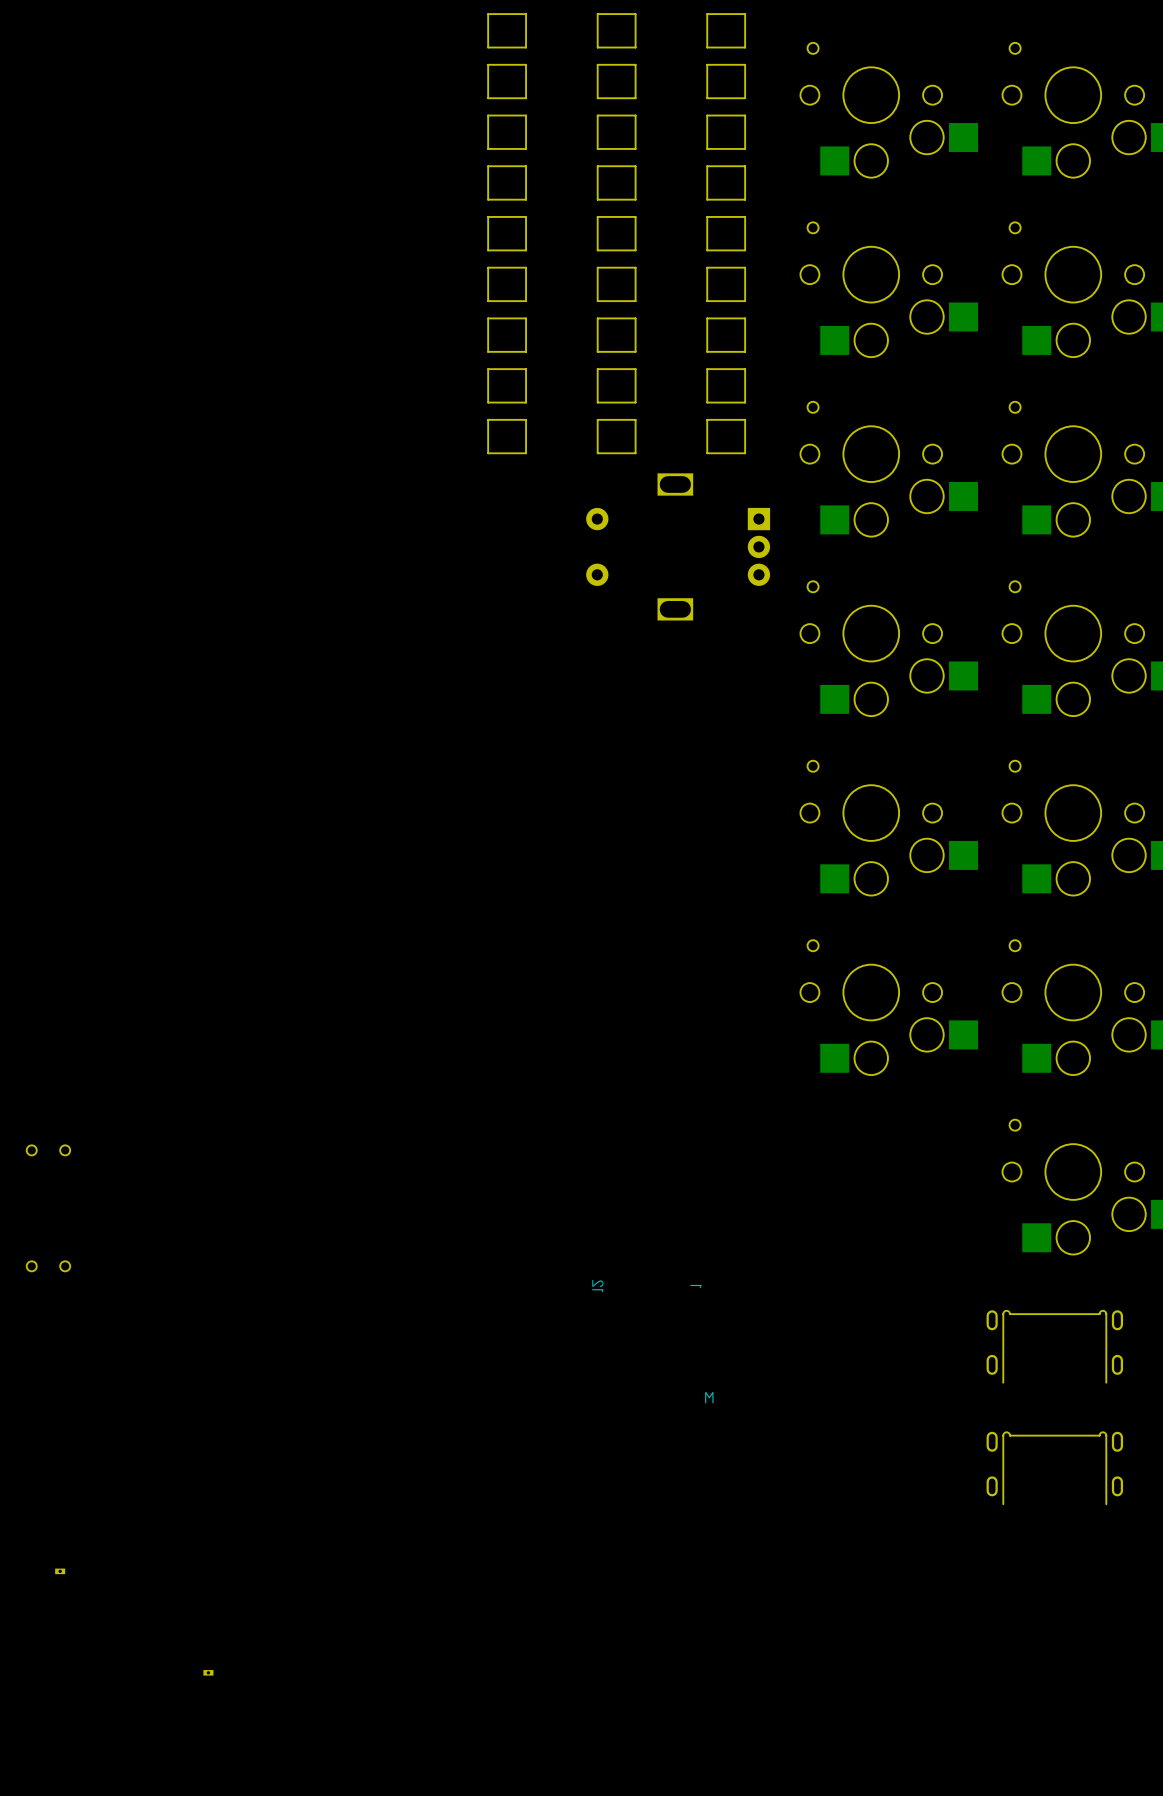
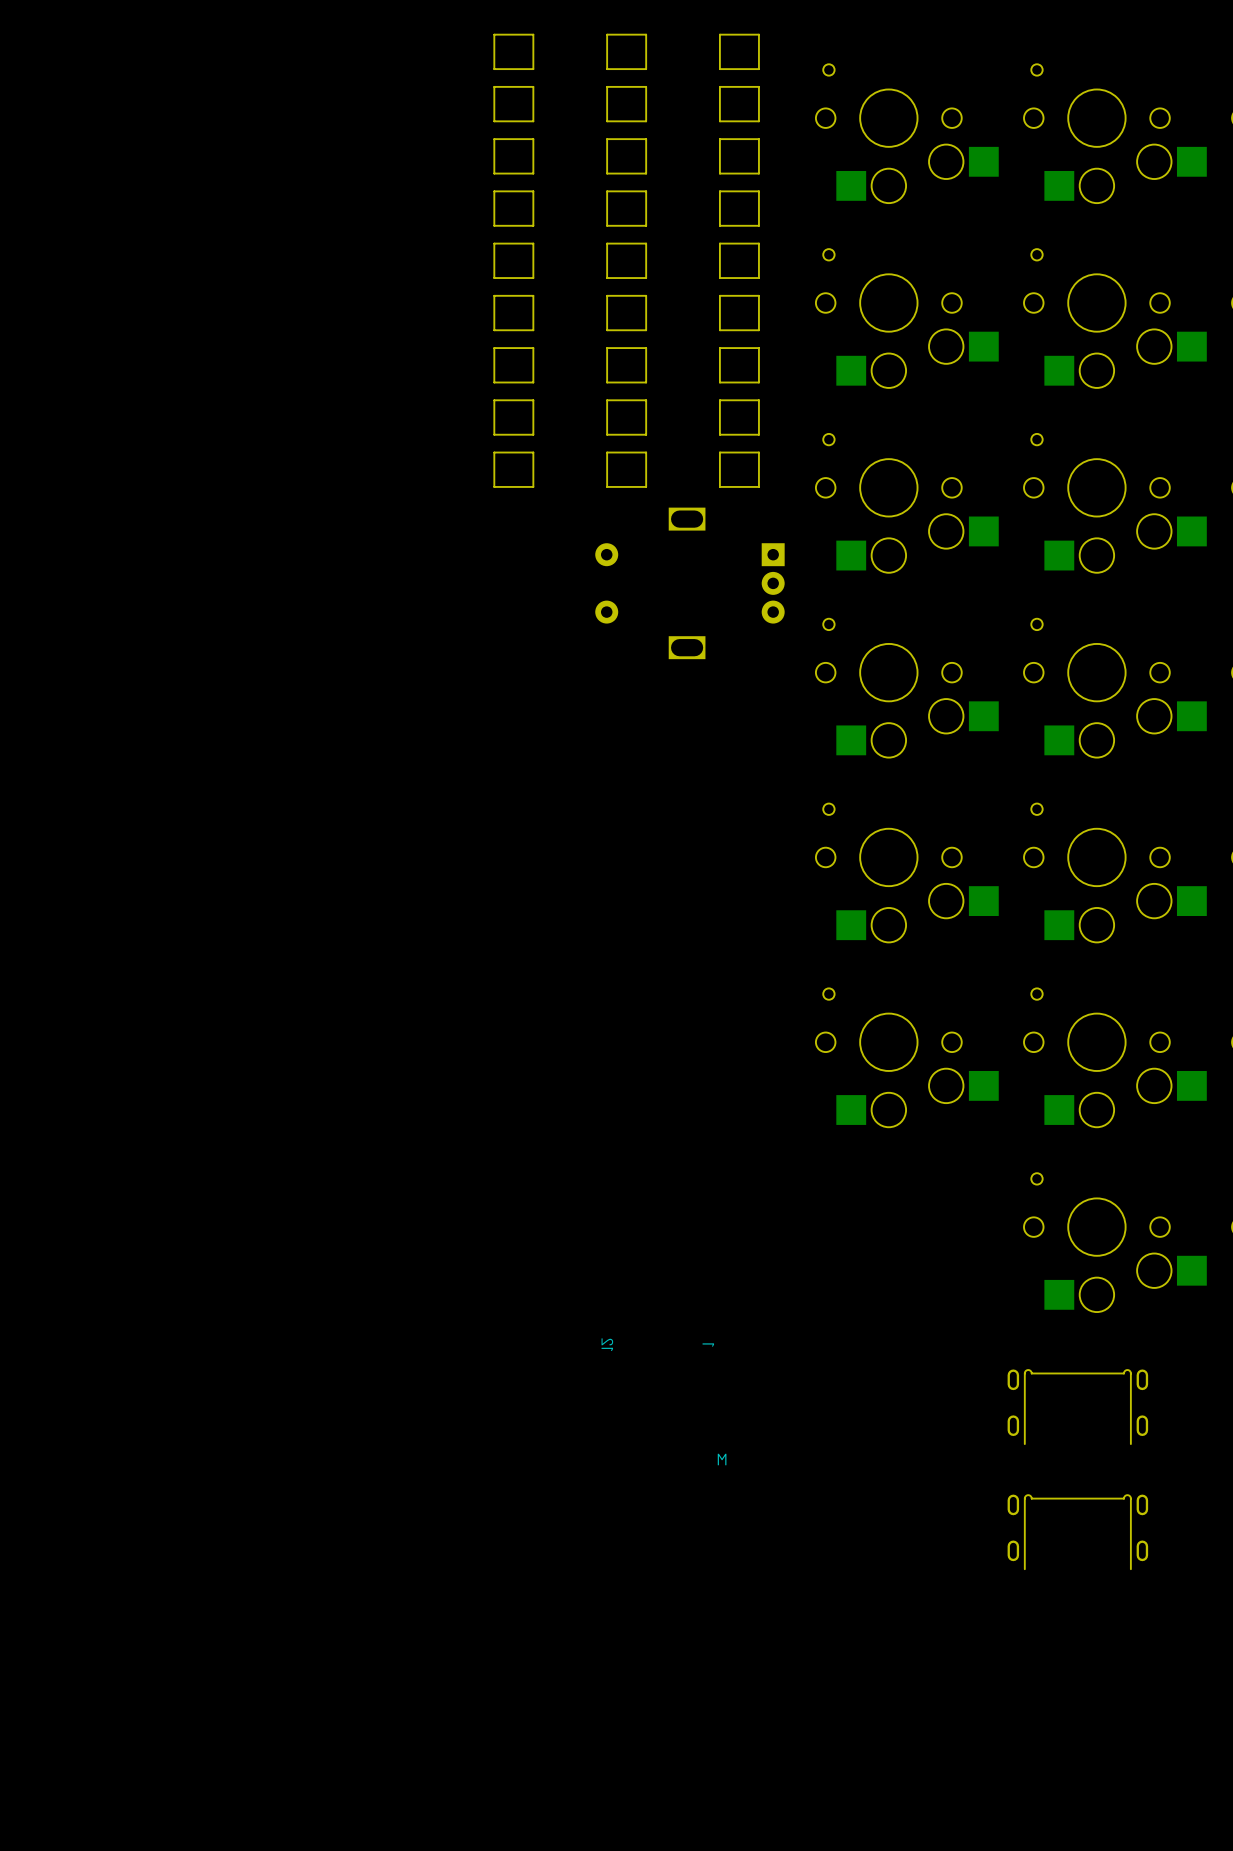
part: (48, 1150) -> none
part: (48, 1266) -> none
part: (60, 1571) -> none
part: (208, 1672) -> none

